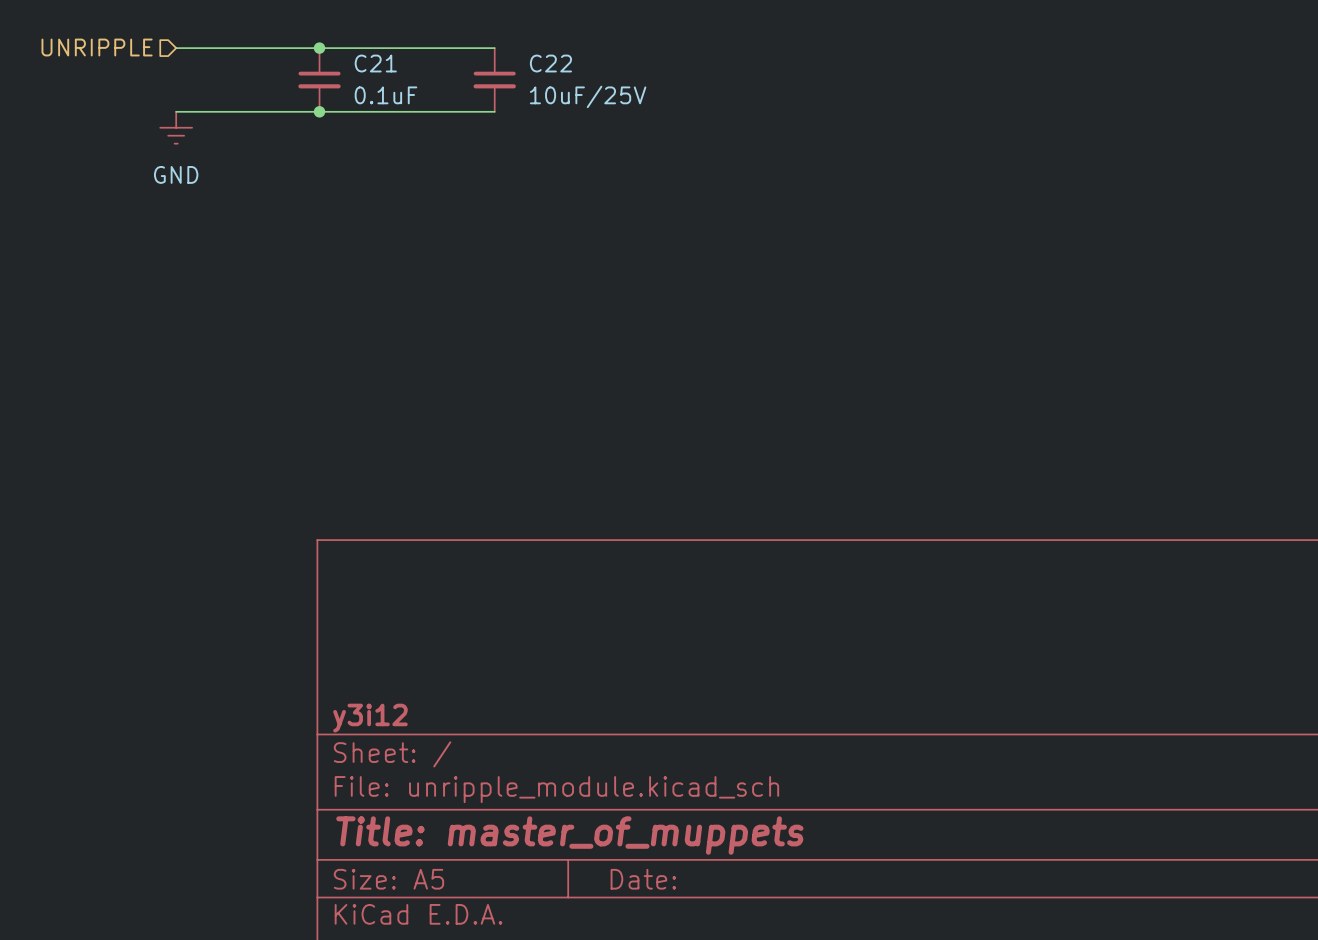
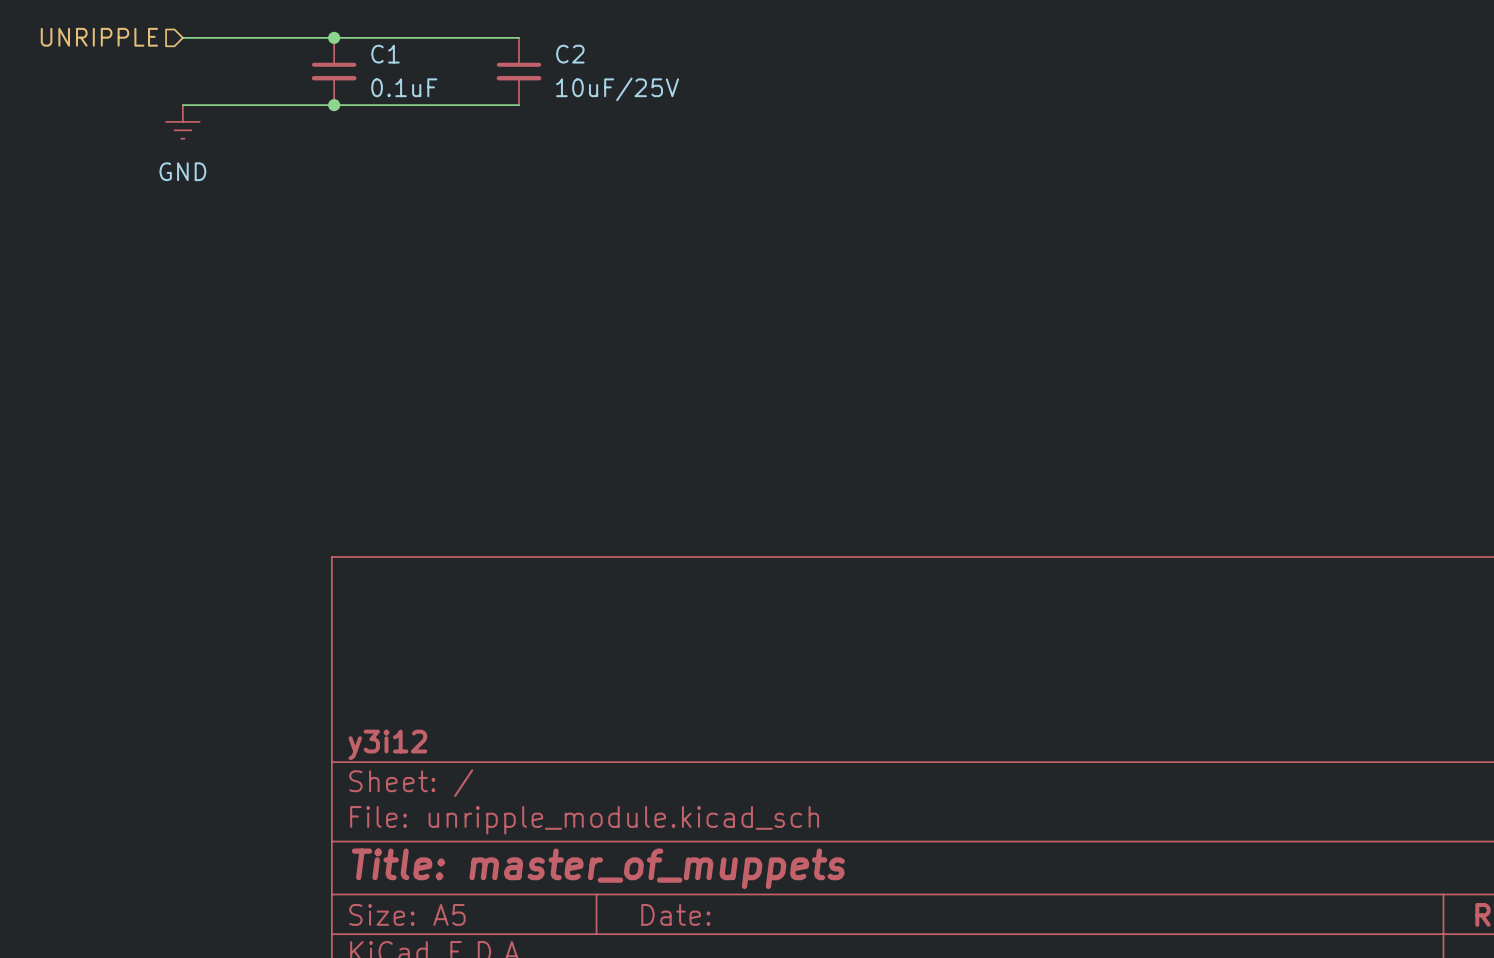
C21 name: C21 (375, 63) -> C1 (385, 54)
C22 name: C22 (550, 63) -> C2 (570, 54)

